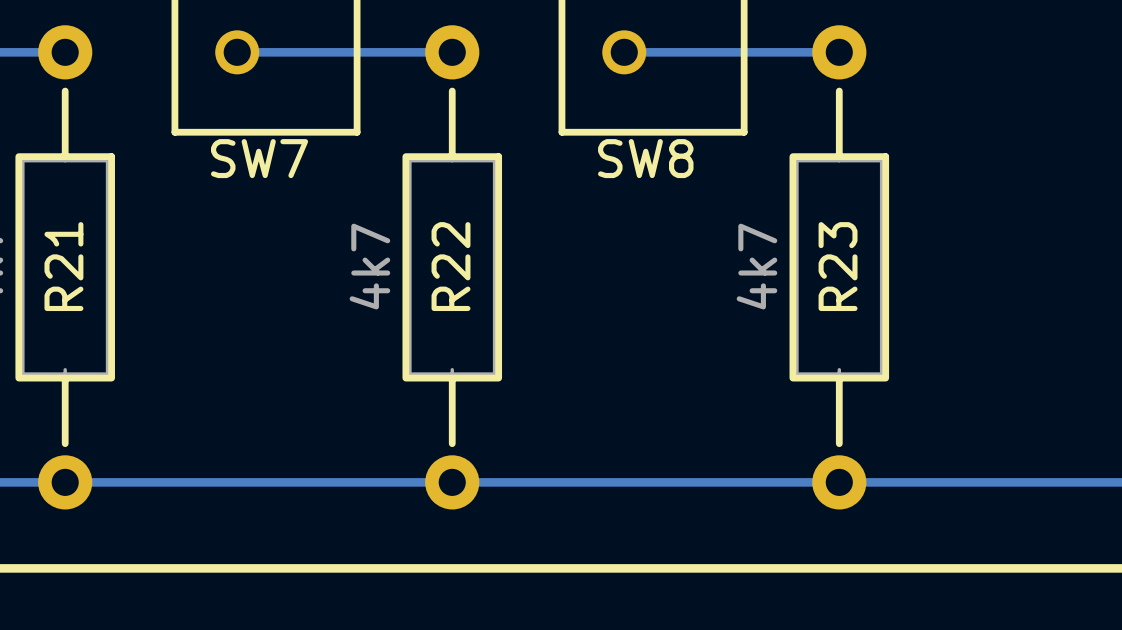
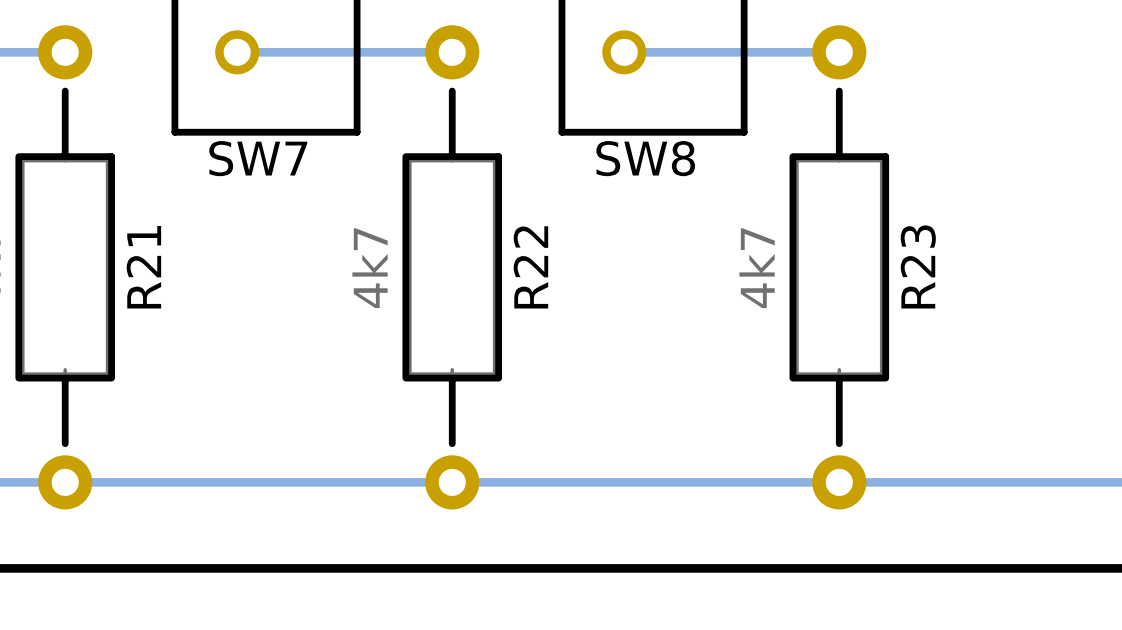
R21 name position: R21 (63, 266) -> R21 (143, 267)
R22 name position: R22 (450, 266) -> R22 (530, 267)
R23 name position: R23 (838, 266) -> R23 (918, 266)

